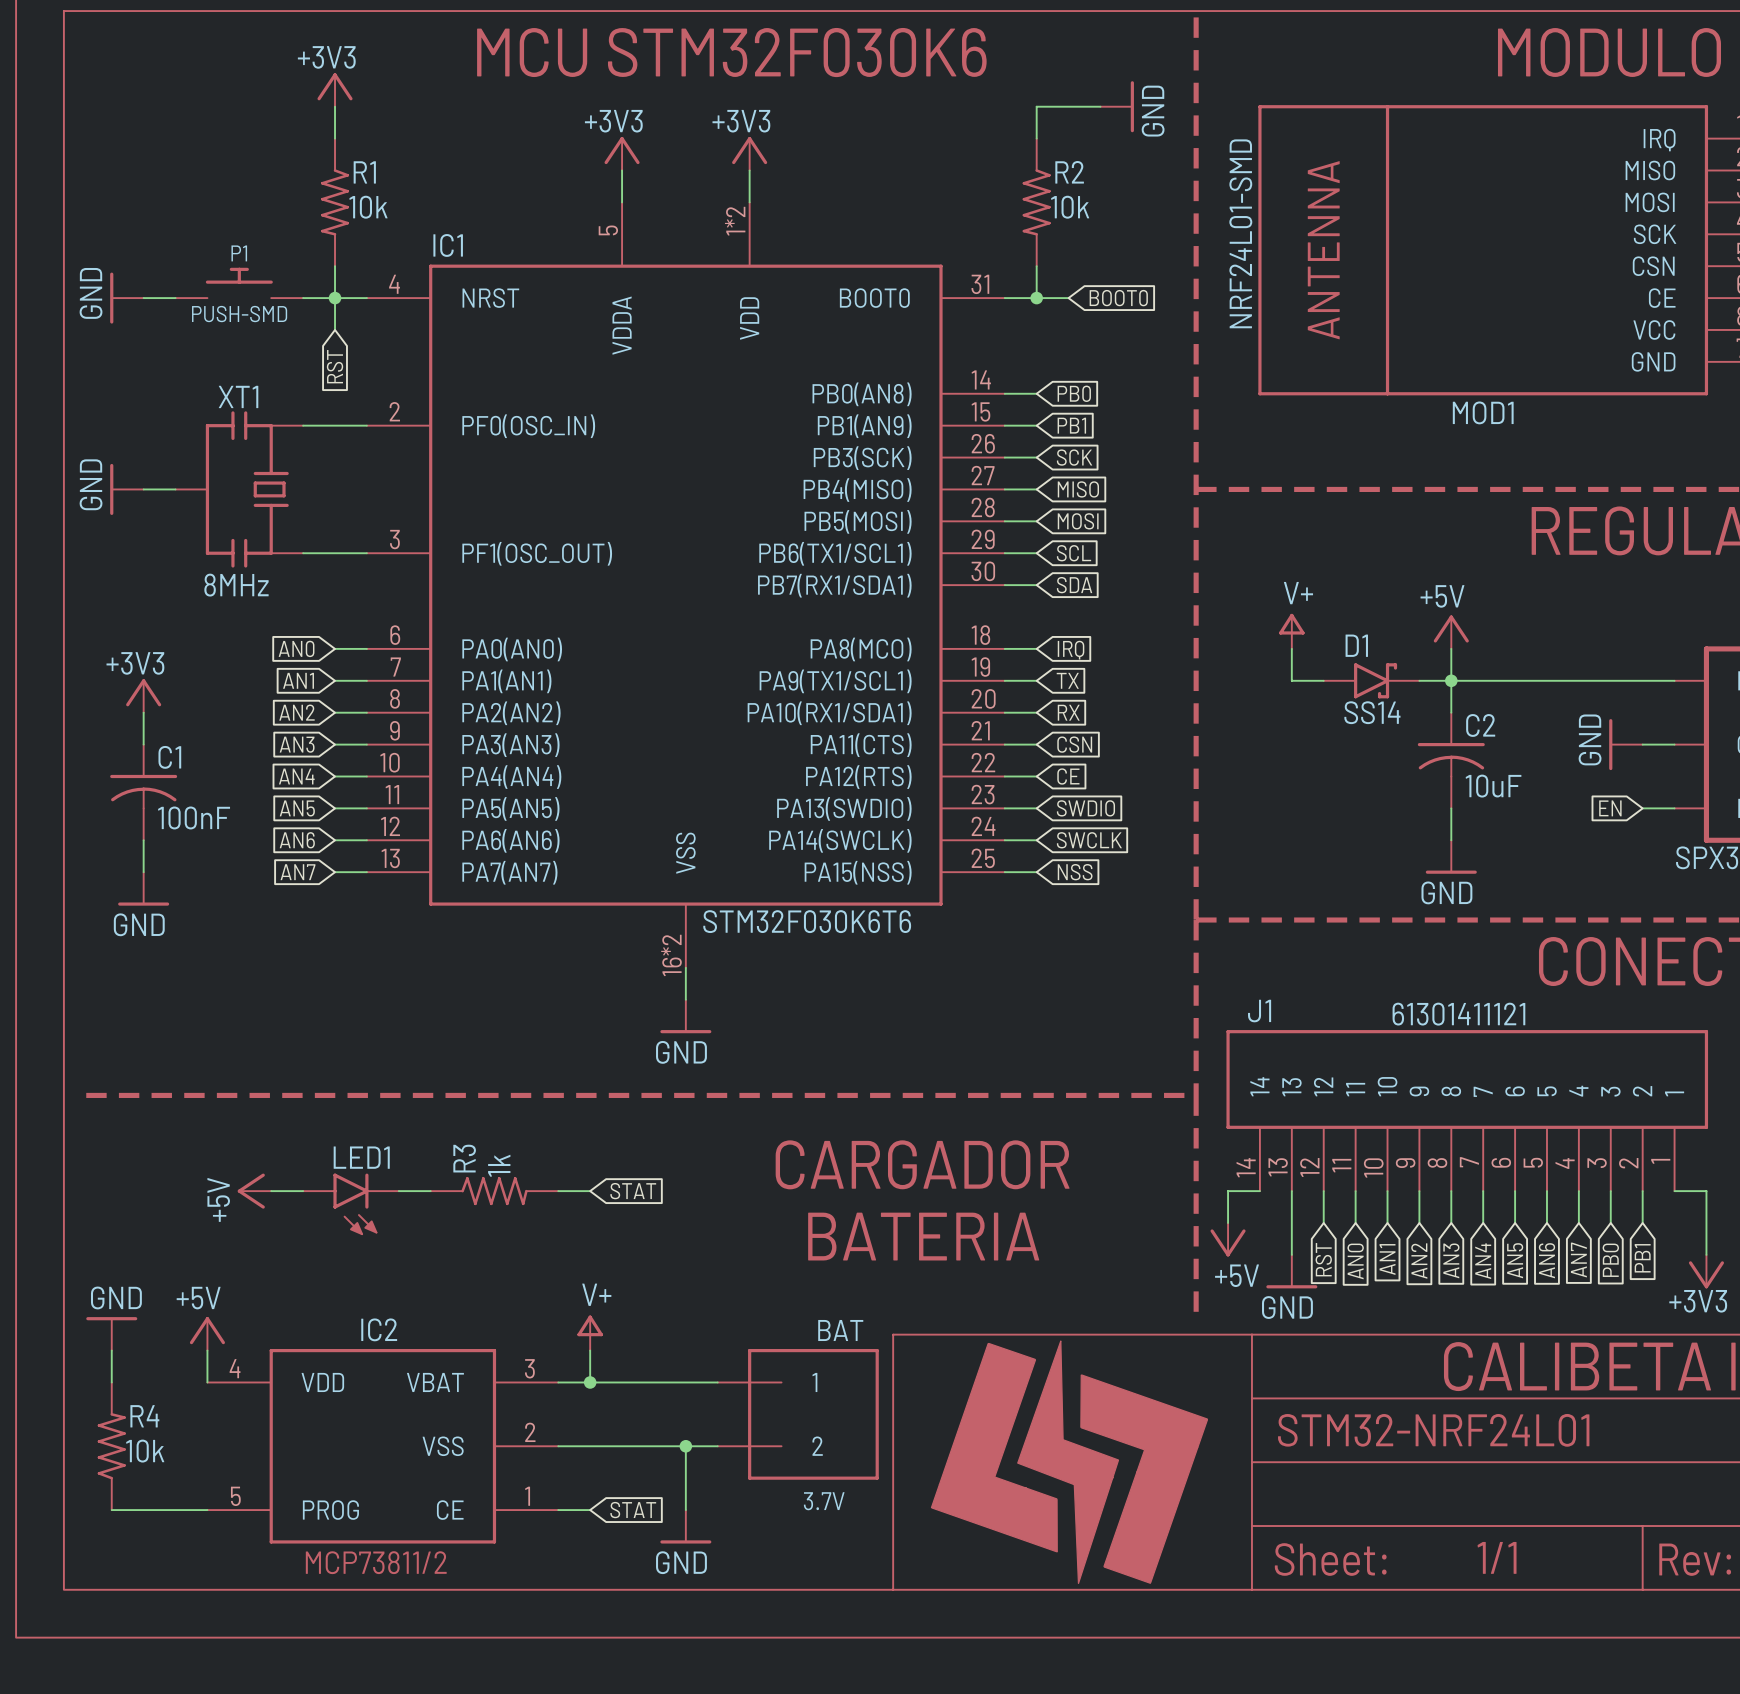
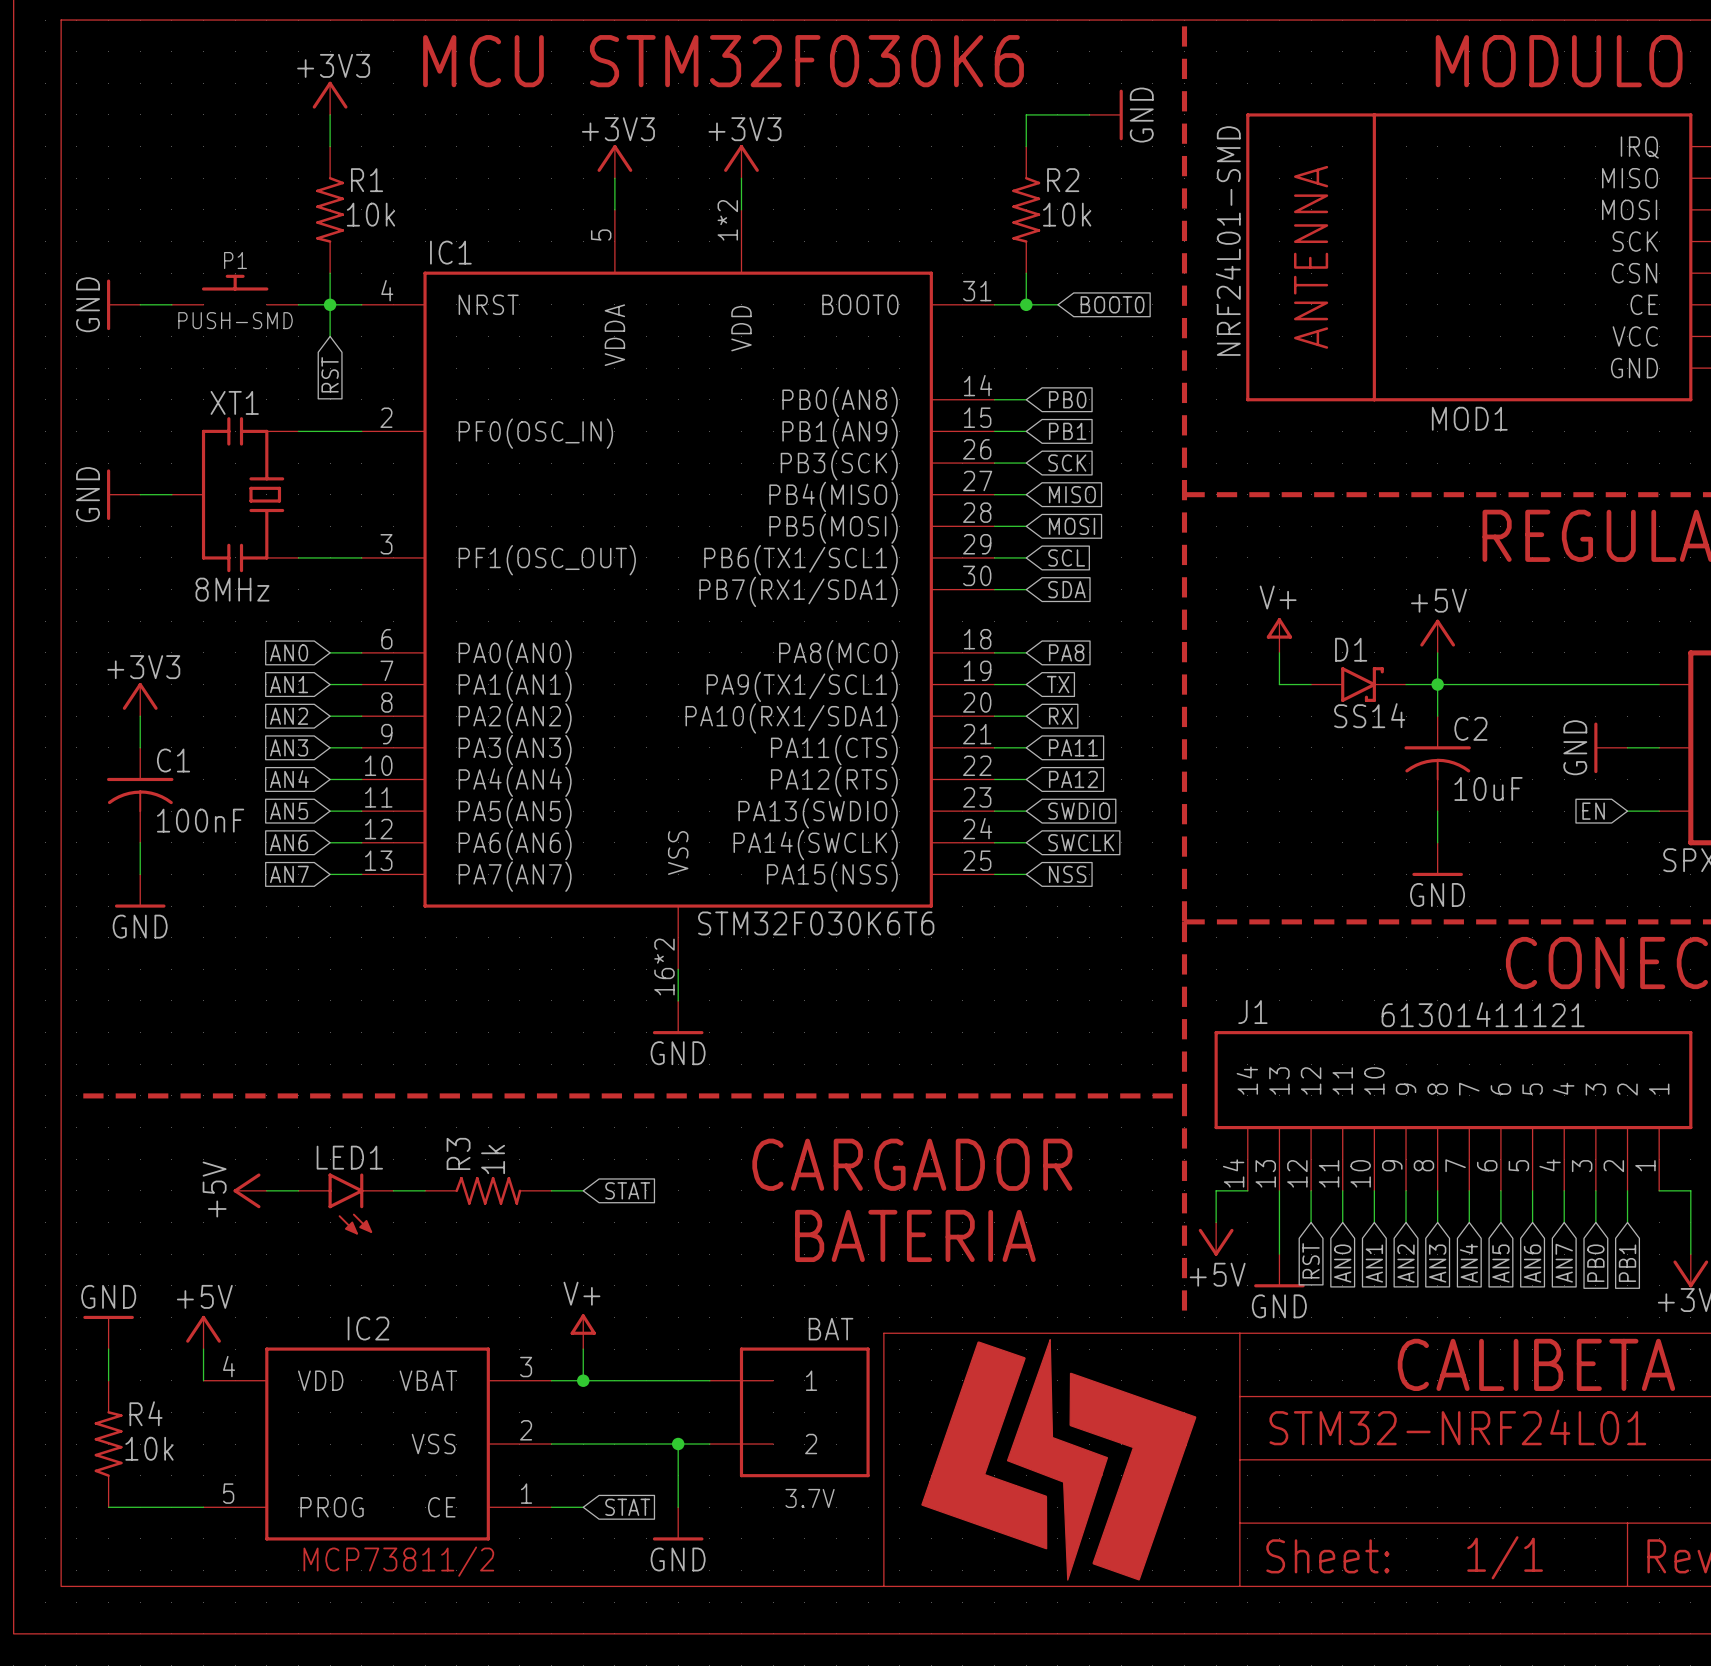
global label: IRQ (1071, 650) -> PA8 (1066, 652)
global label: CSN (1074, 744) -> PA11 (1073, 747)
global label: CE (1068, 776) -> PA12 (1073, 779)

